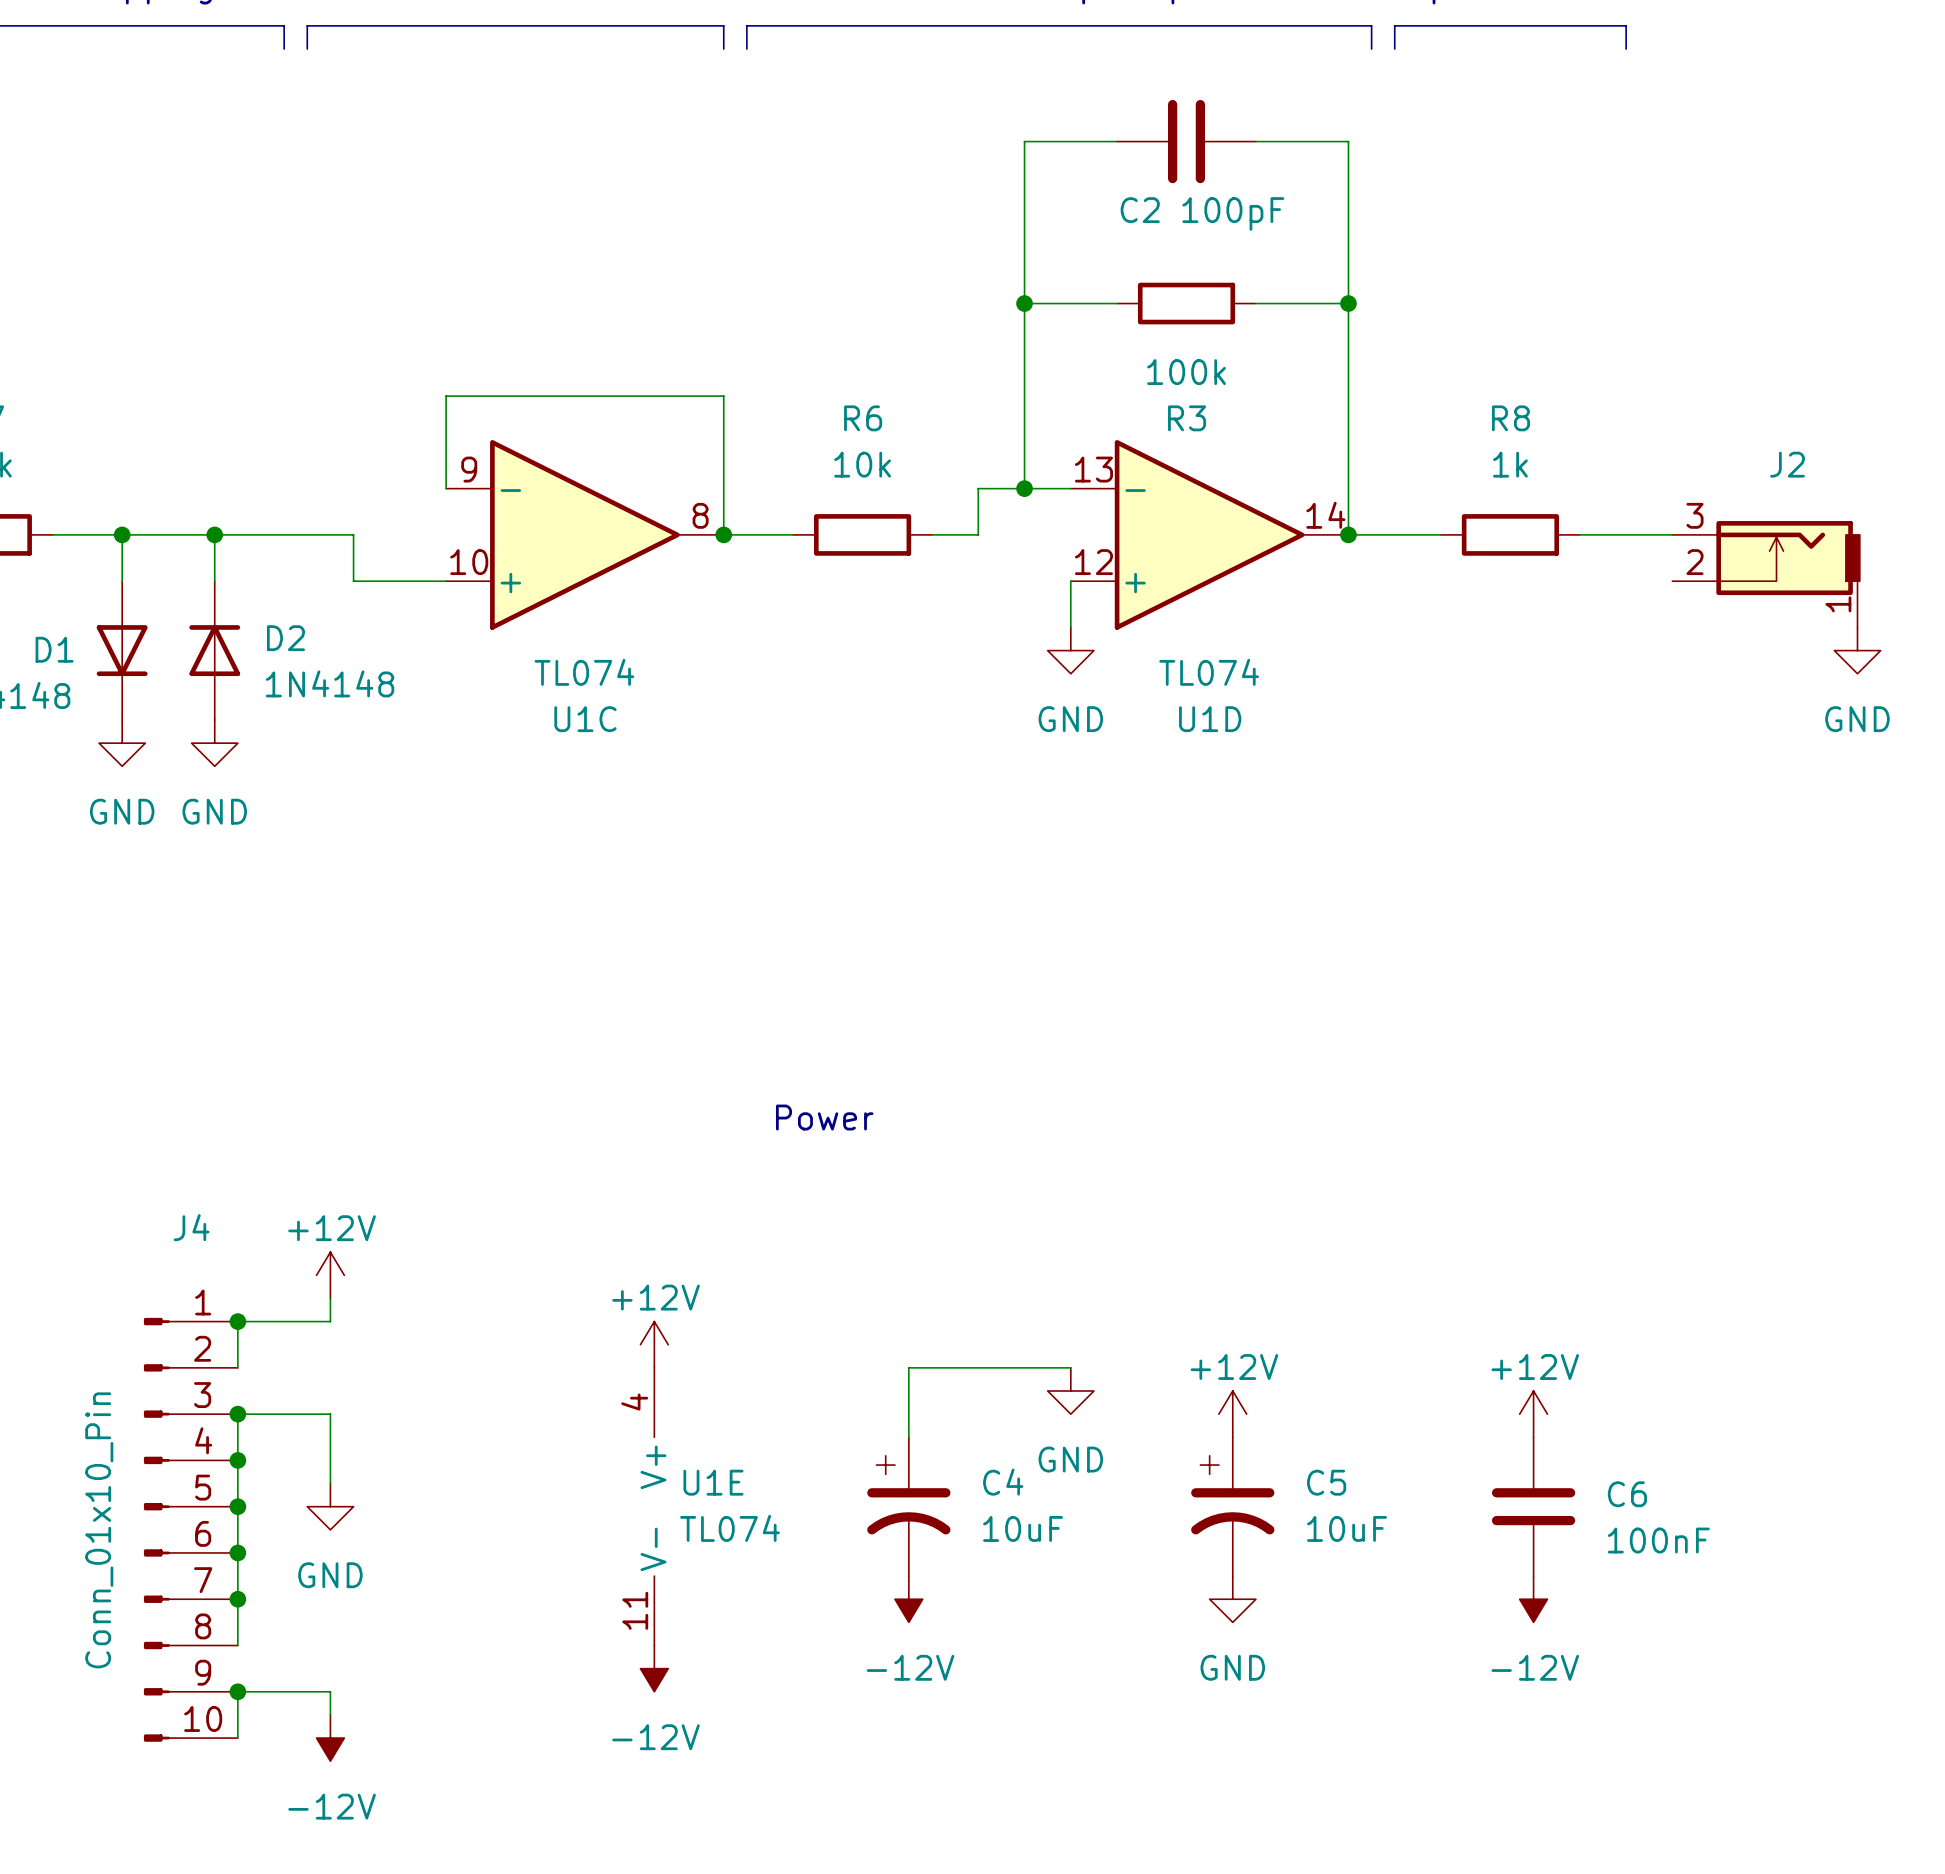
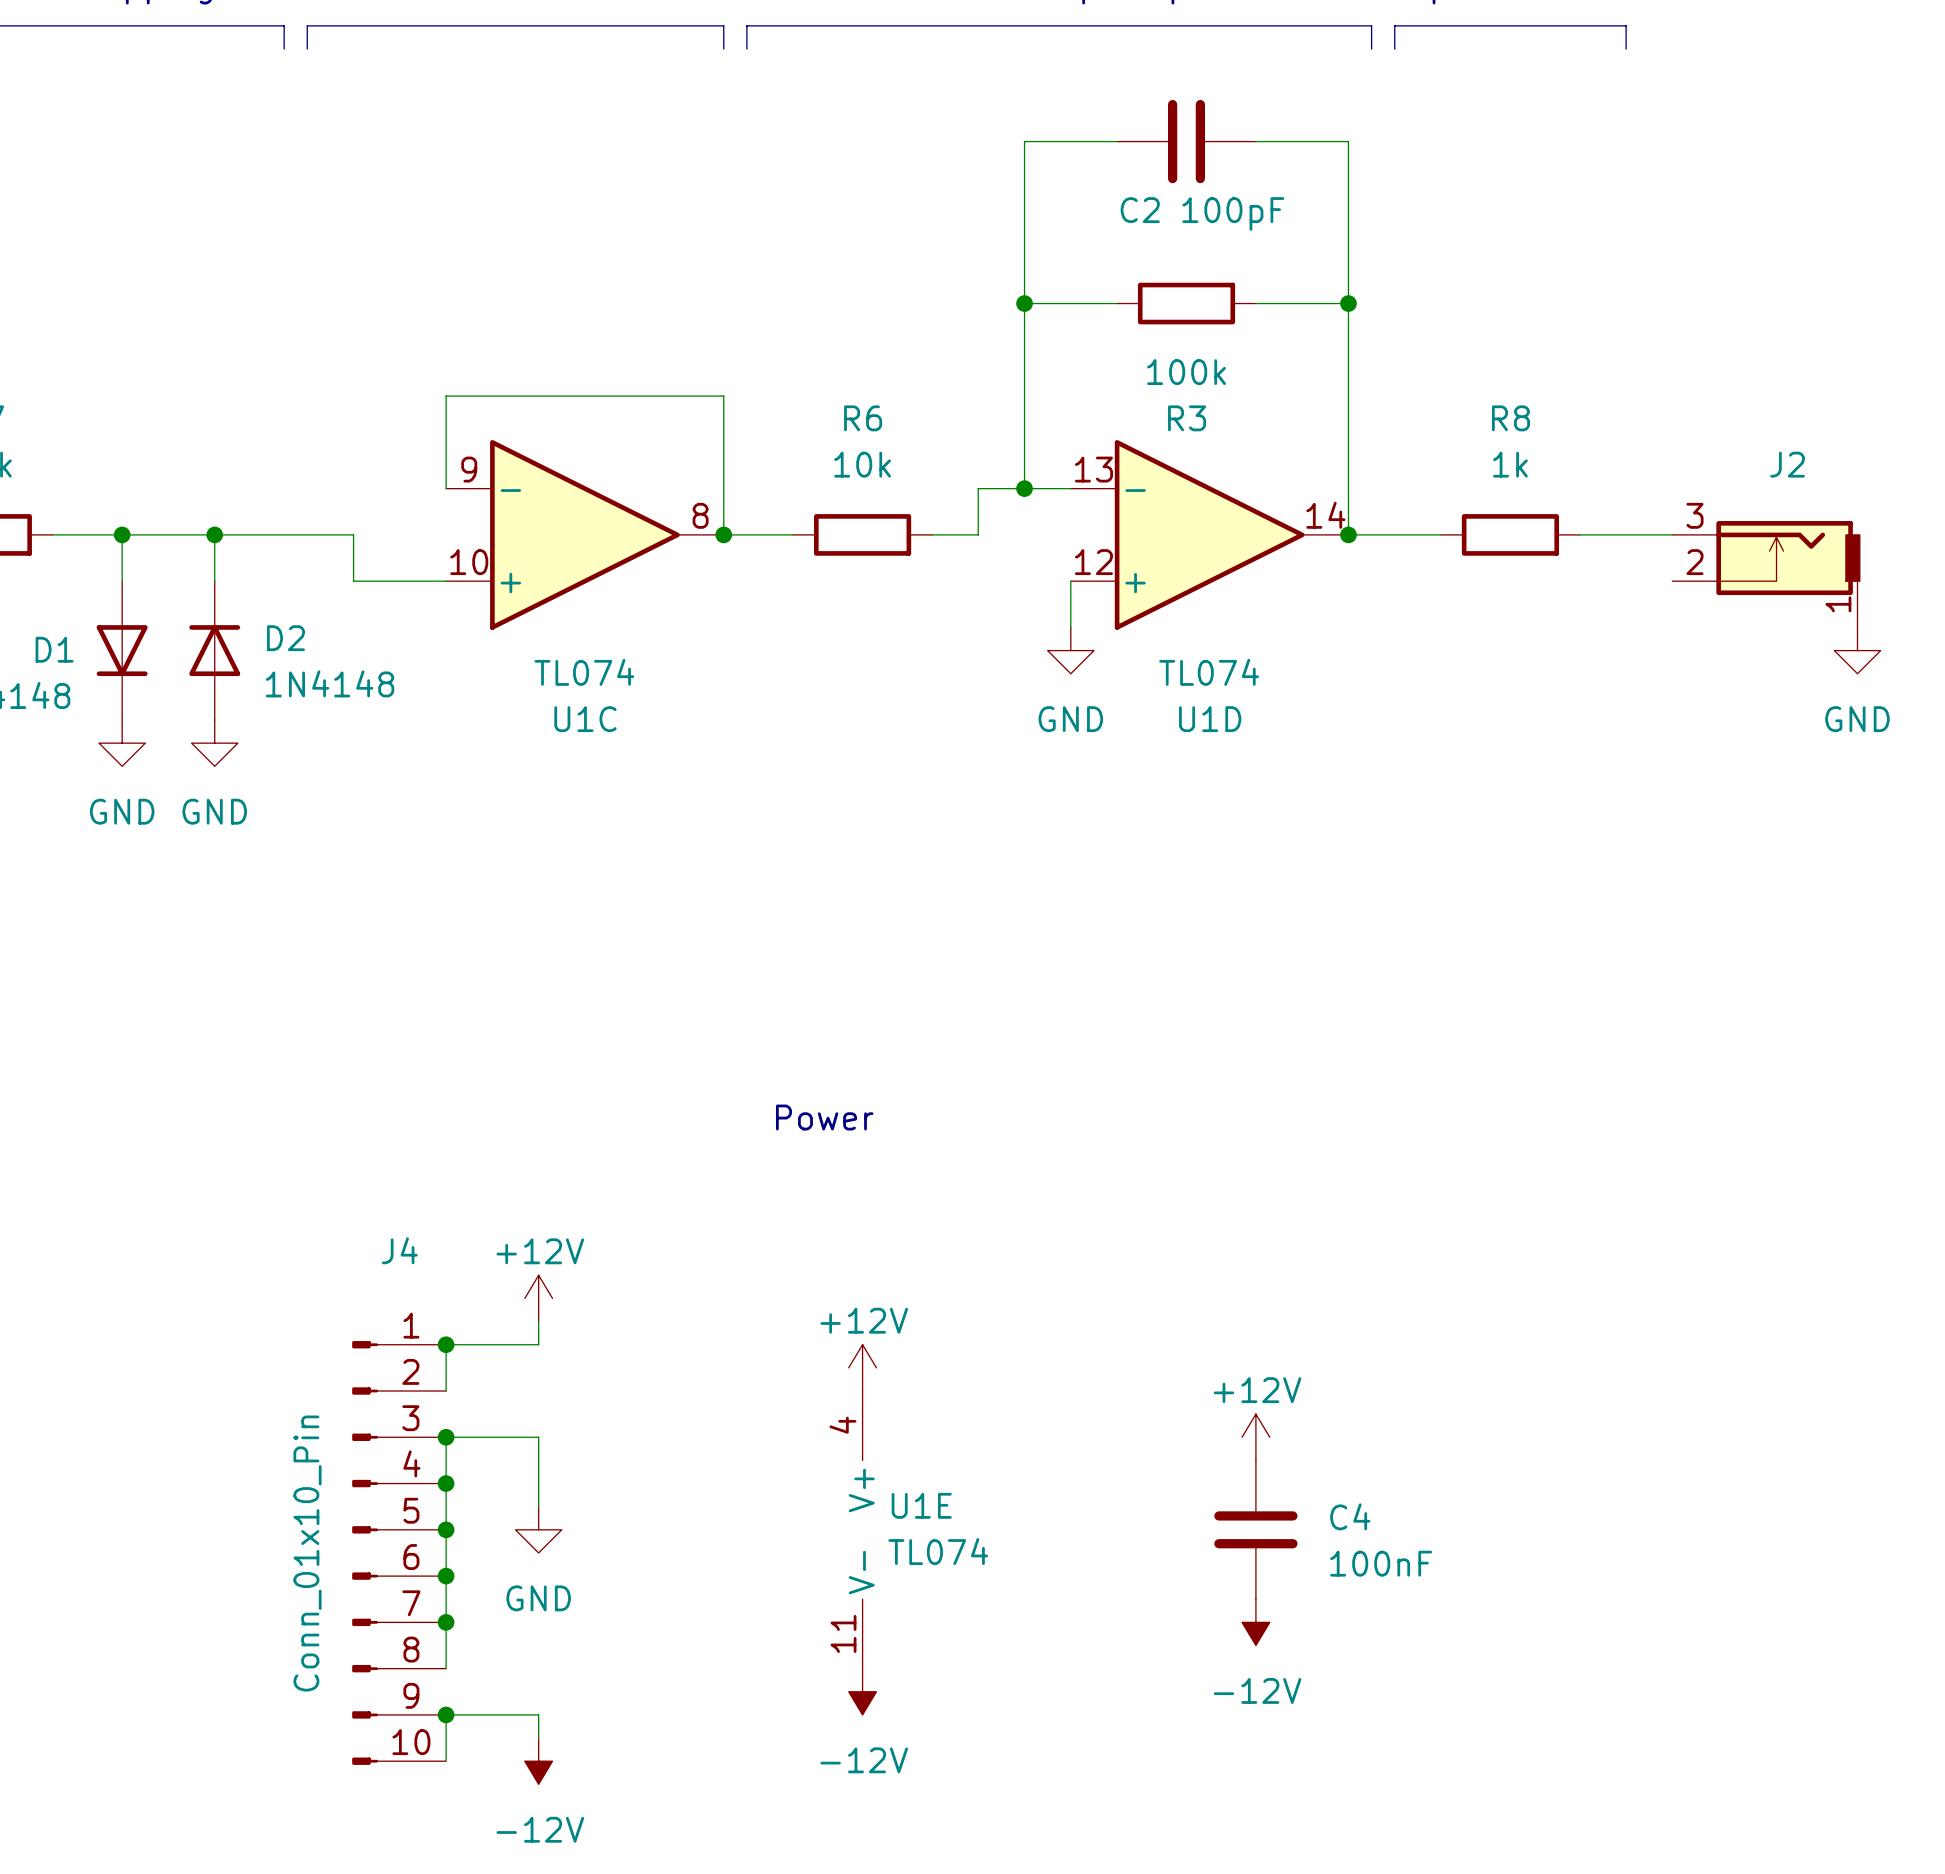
power symbol: +12V (330, 1275) -> none
wire: (330, 1298) (330, 1321) (237, 1321) (237, 1367) -> (538, 1321) (538, 1344) (446, 1344) (446, 1391)
power symbol: none -> +12V (538, 1298)
junction: (237, 1321) -> none
junction: none -> (446, 1344)
power symbol: +12V (654, 1344) -> none
power symbol: none -> +12V (862, 1367)
wire: (1070, 1367) (908, 1367) (908, 1437) -> none
power symbol: GND (1070, 1391) -> none
junction: (237, 1414) -> none
power symbol position: +12V (1232, 1414) -> +12V (1255, 1437)
power symbol: +12V (1533, 1414) -> none
junction: none -> (446, 1437)
C4 symbol: [867, 1437, 951, 1577] -> [1214, 1460, 1298, 1600]
junction: (237, 1460) -> none
wire: (330, 1483) (330, 1414) (237, 1414) (237, 1645) -> (538, 1506) (538, 1437) (446, 1437) (446, 1668)
junction: none -> (446, 1483)
junction: (237, 1506) -> none
power symbol position: GND (330, 1506) -> GND (538, 1529)
U1E position: (654, 1506) -> (862, 1529)
C5: 10uF (1232, 1506) -> none
C6: 100nF (1533, 1506) -> none
C4 value: 10uF (1023, 1528) -> 100nF (1381, 1563)
J4 position: (190, 1529) -> (399, 1552)
junction: none -> (446, 1529)
junction: (237, 1552) -> none
junction: none -> (446, 1576)
junction: (237, 1599) -> none
power symbol position: -12V (908, 1599) -> -12V (862, 1691)
power symbol: GND (1232, 1599) -> none
power symbol: -12V (1533, 1599) -> none
junction: none -> (446, 1622)
power symbol: none -> -12V (1255, 1622)
power symbol: -12V (654, 1668) -> none
junction: (237, 1691) -> none
wire: (330, 1714) (330, 1691) (237, 1691) (237, 1738) -> (538, 1738) (538, 1714) (446, 1714) (446, 1761)
junction: none -> (446, 1714)
power symbol: -12V (330, 1738) -> none
power symbol: none -> -12V (538, 1761)

